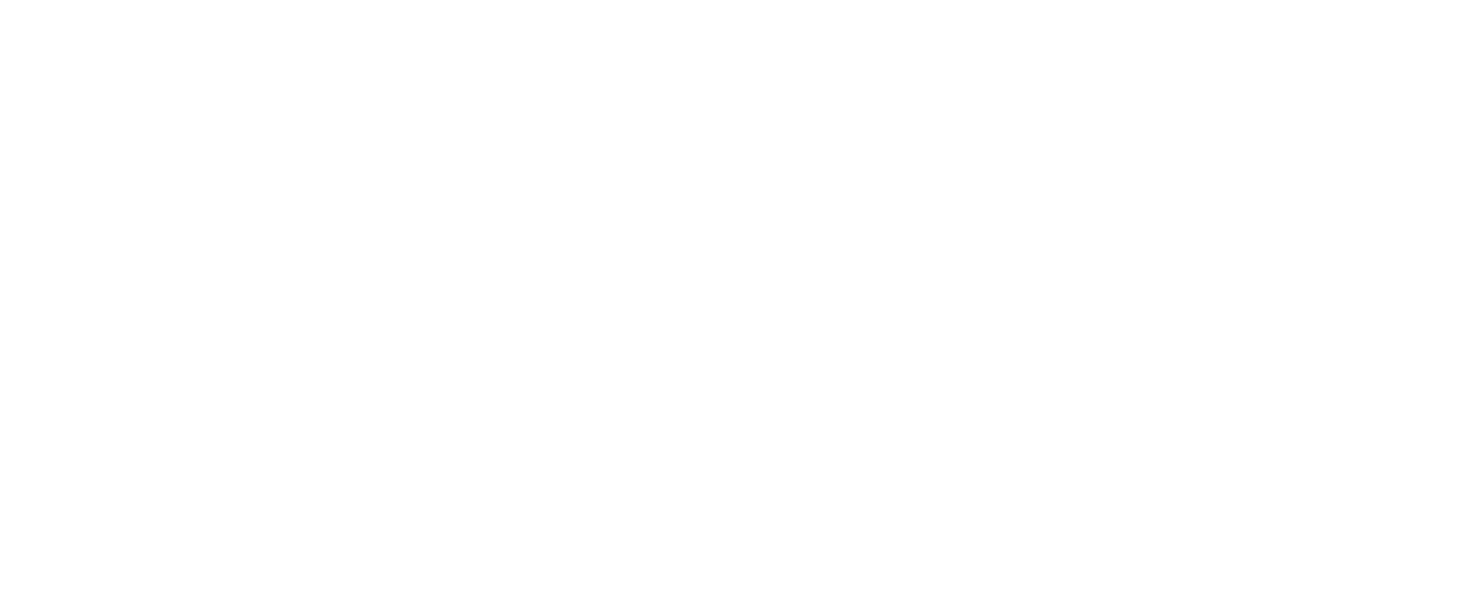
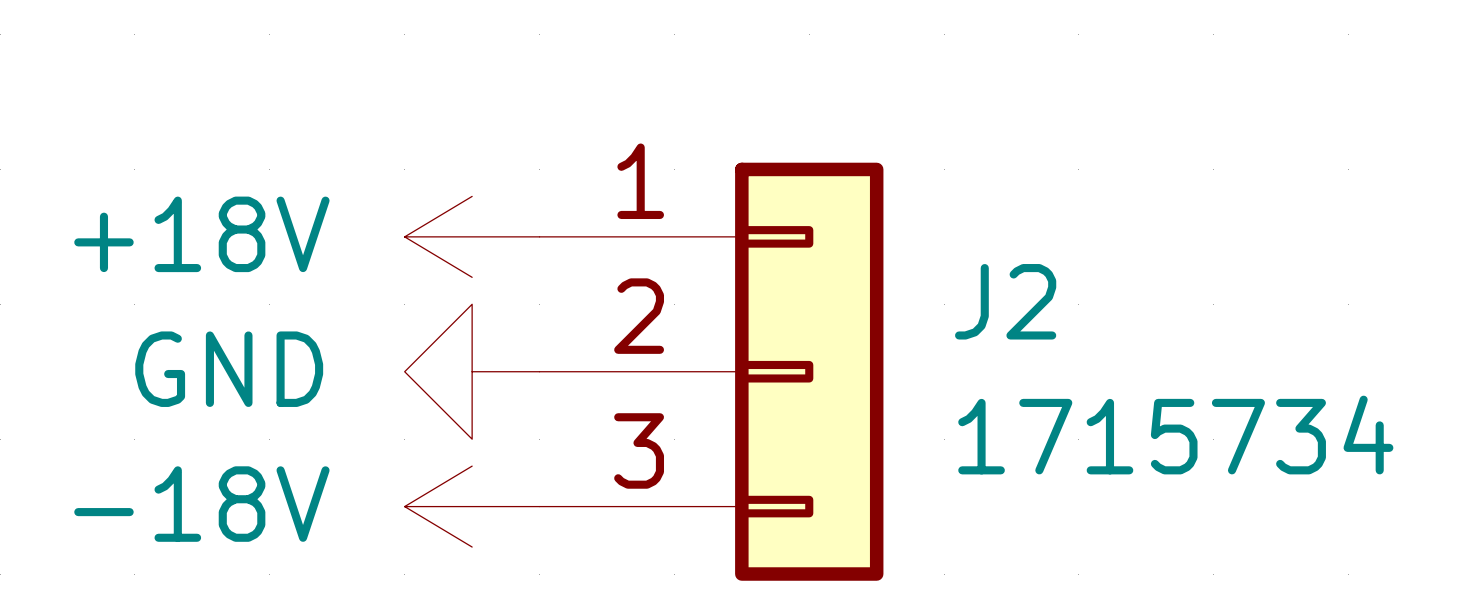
power symbol: none -> +18V (472, 236)
power symbol: none -> GND (472, 371)
J2: none -> 1715734 (711, 371)
power symbol: none -> -18V (472, 506)

